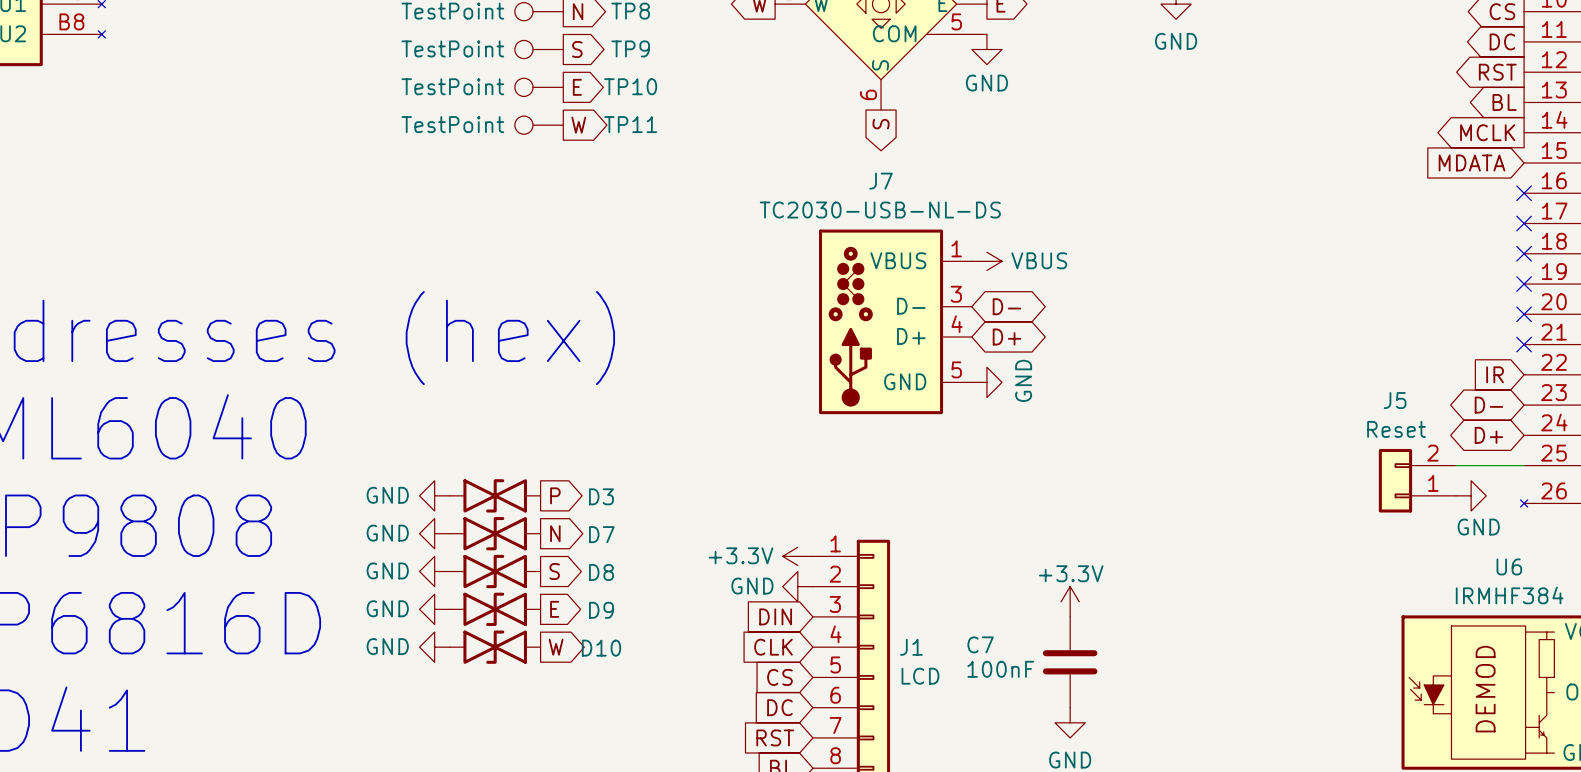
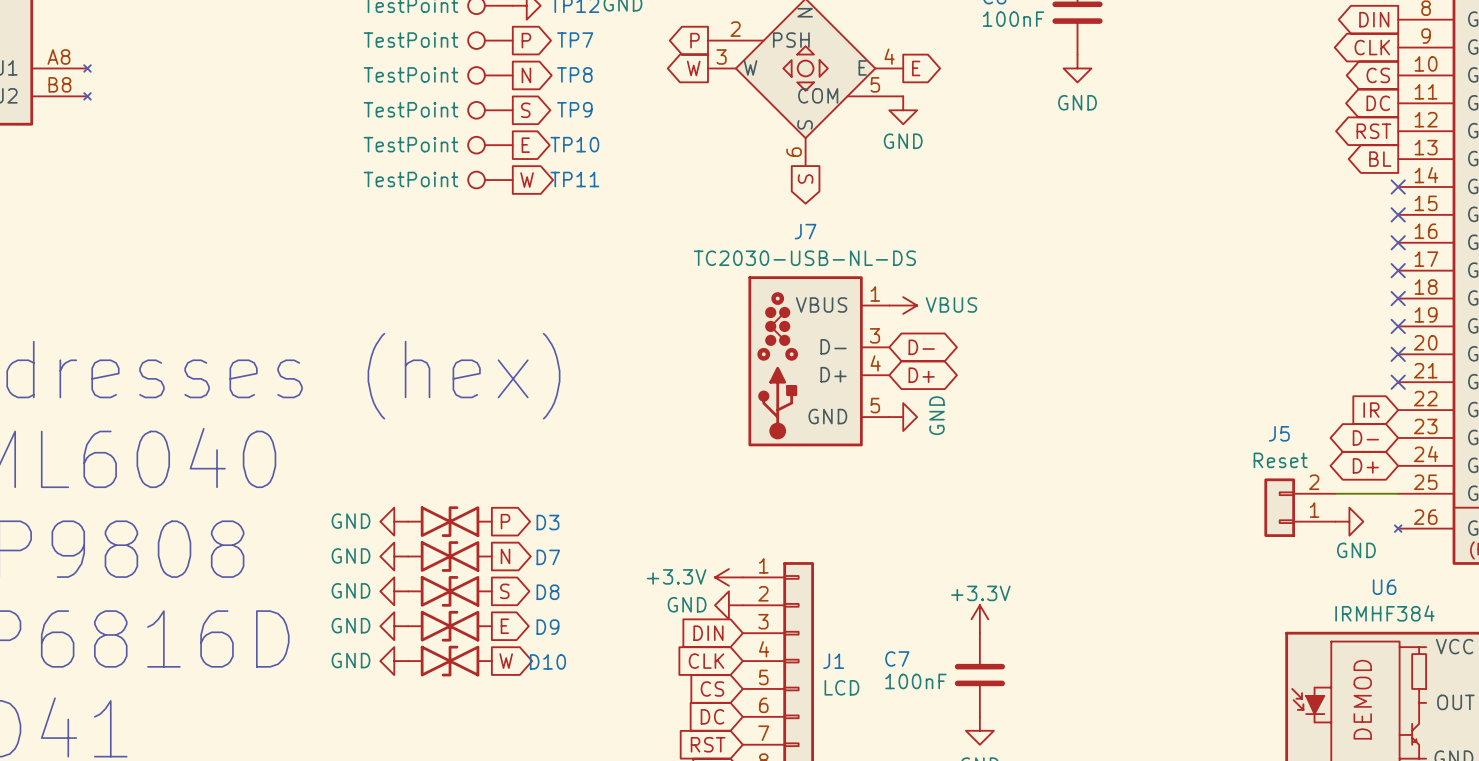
global label: MCLK (1487, 132) -> none
no-connect mark: none -> (1398, 186)
global label: MDATA (1472, 162) -> none
no-connect mark: none -> (1398, 214)

